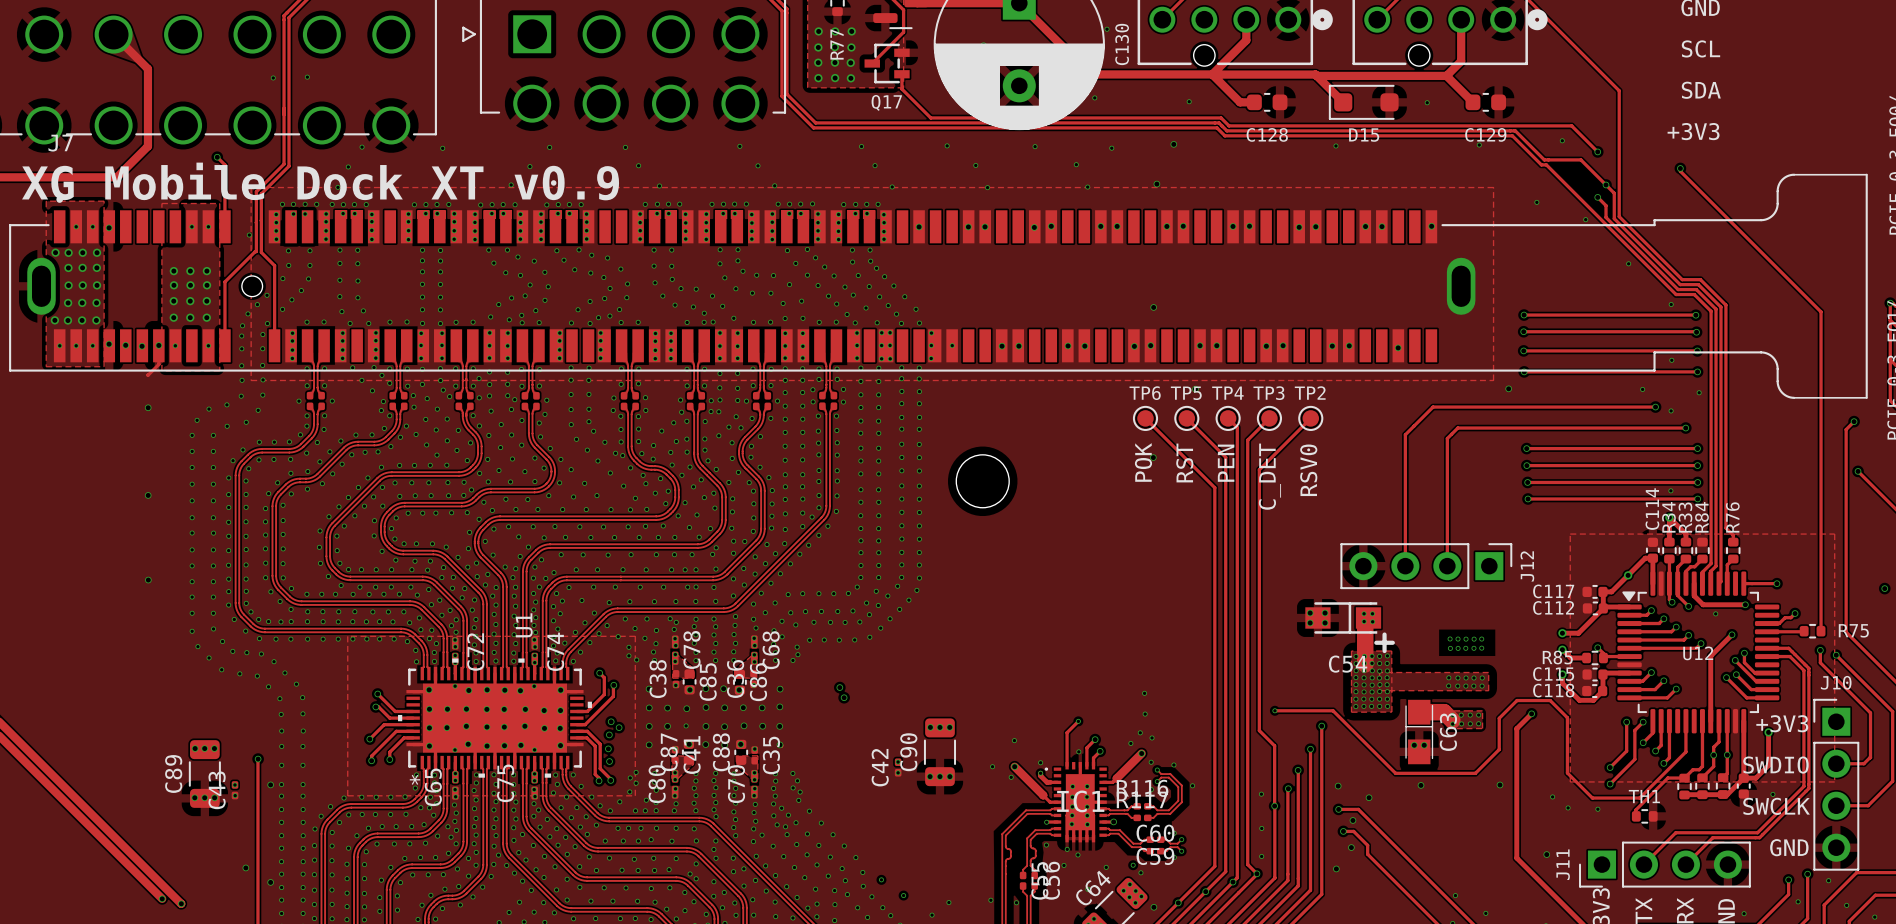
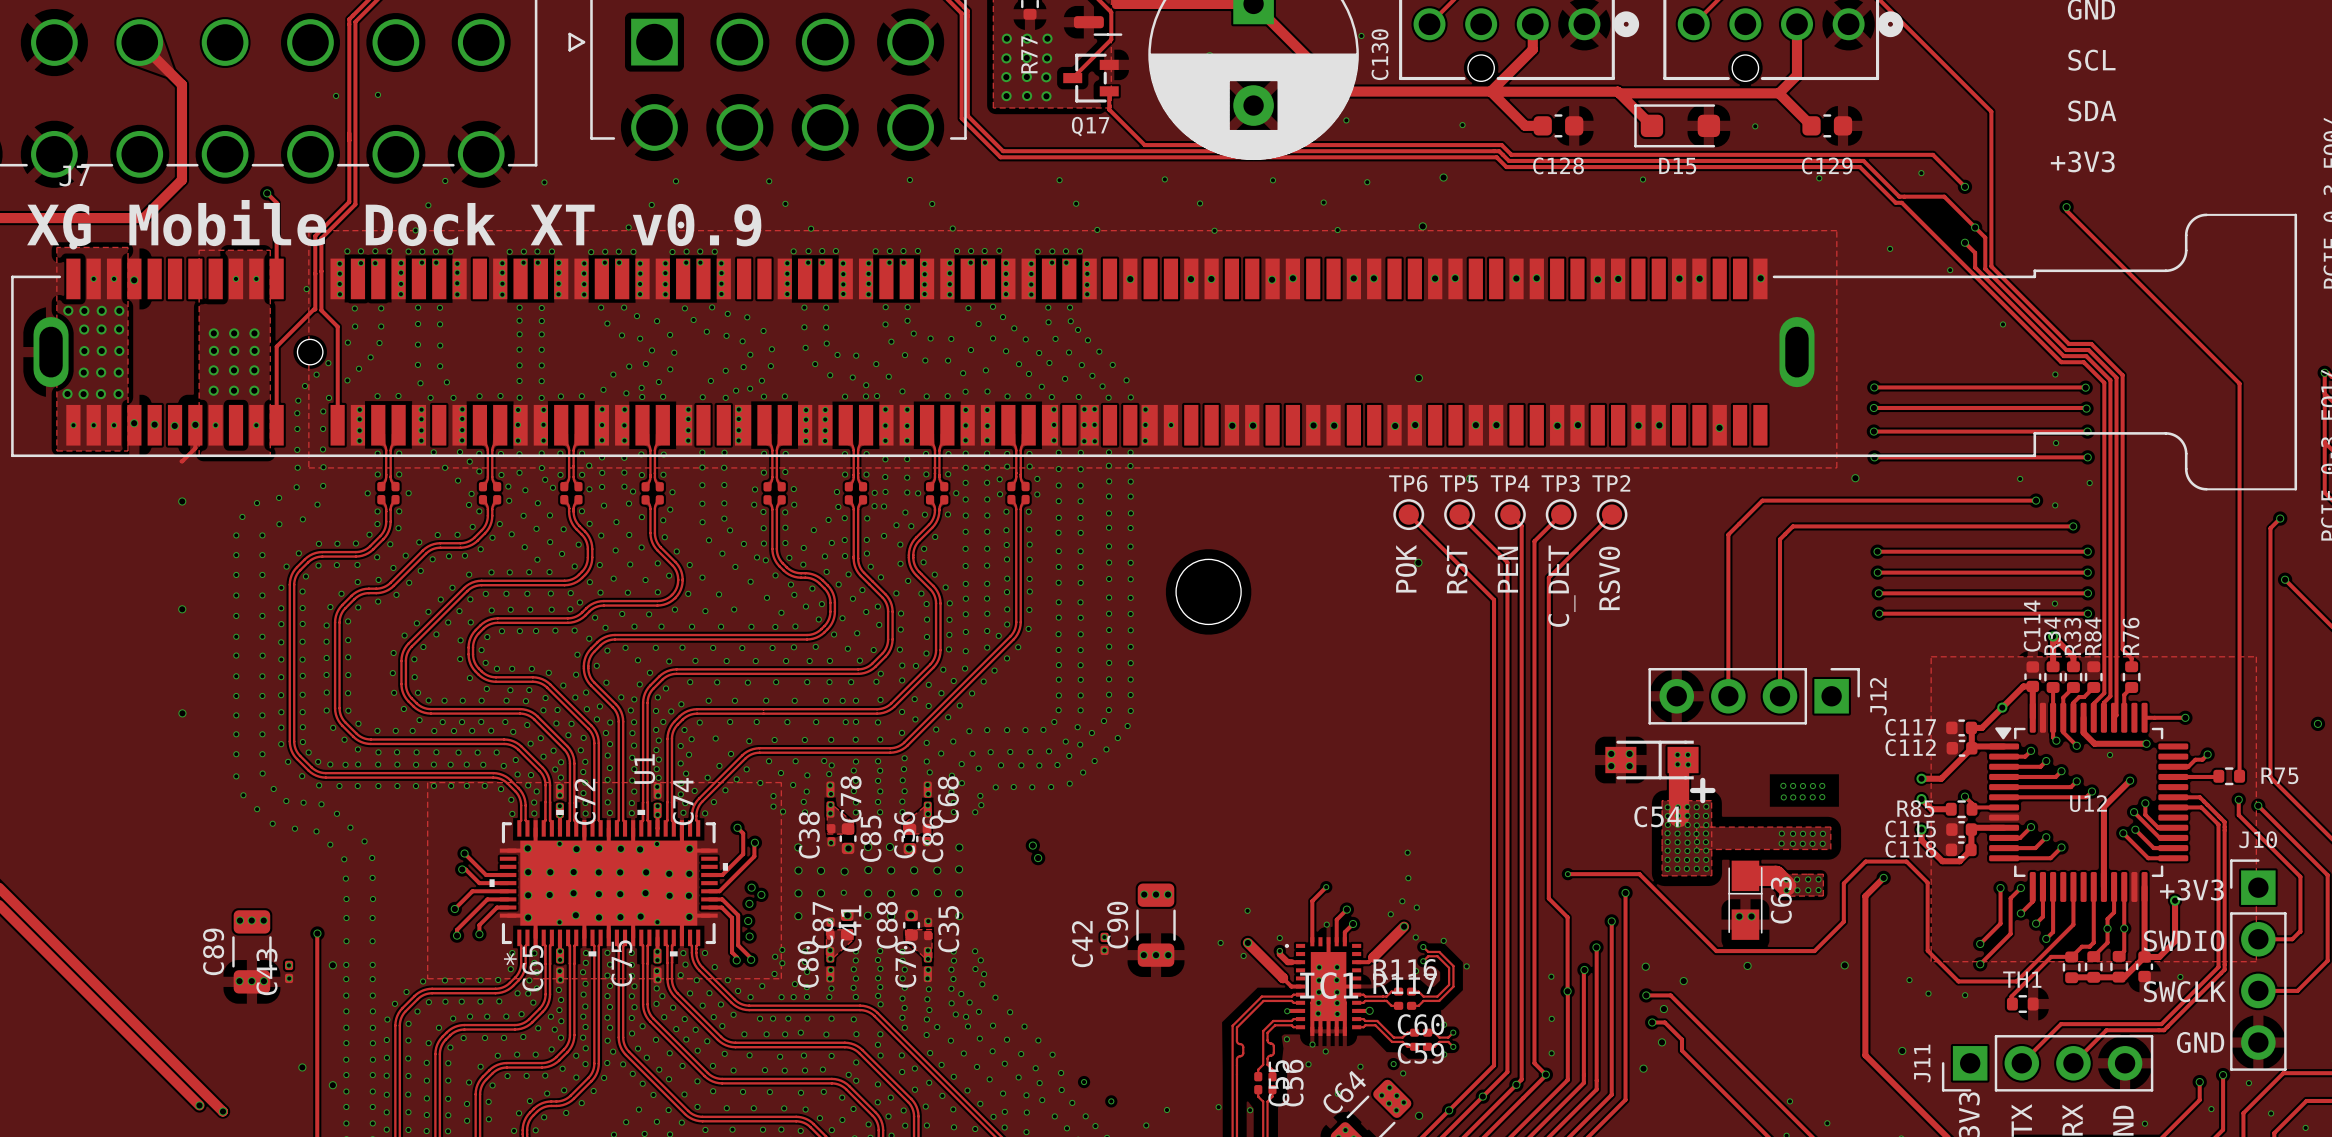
J7 footprint: [9, 173, 1868, 399] -> [11, 213, 2298, 491]

